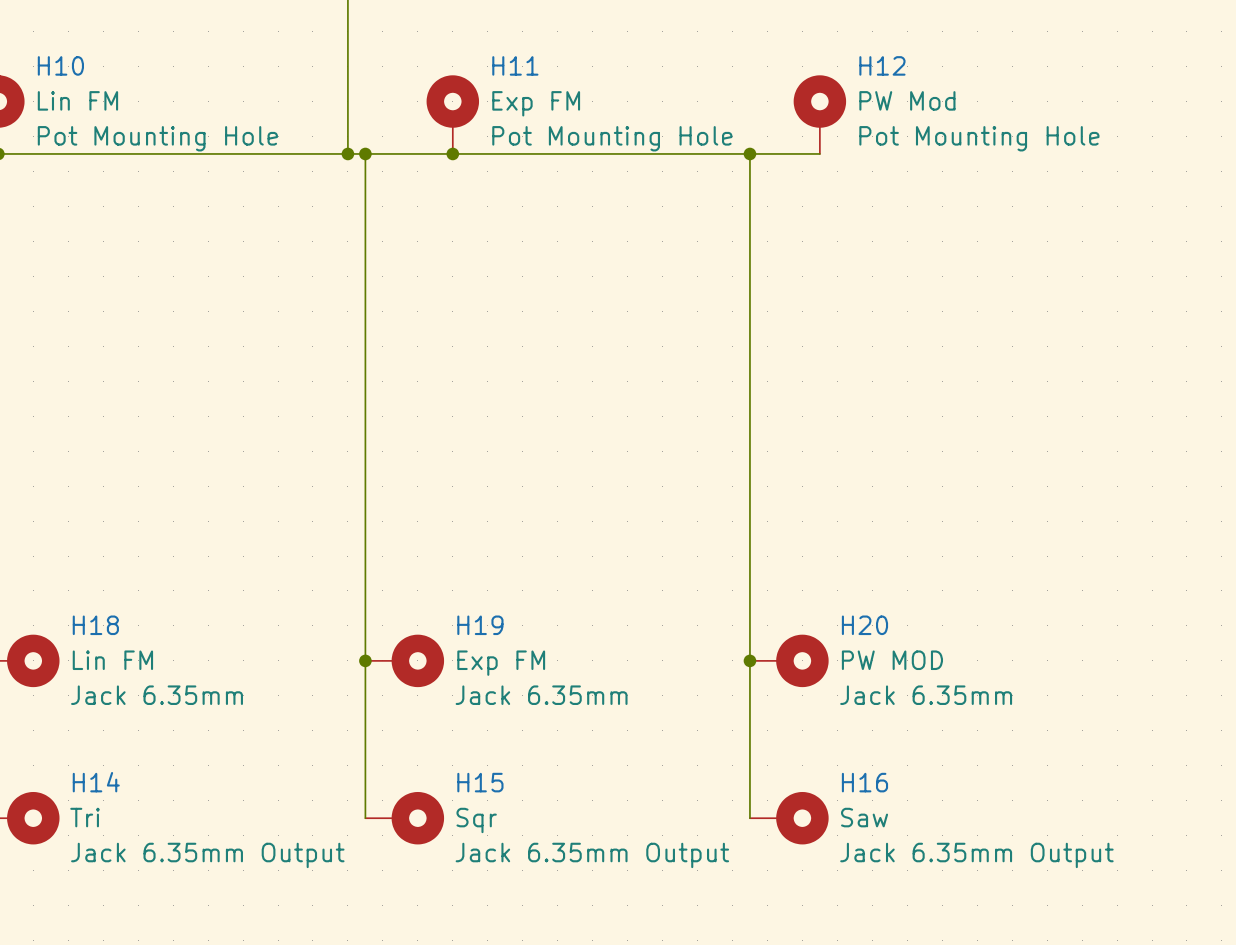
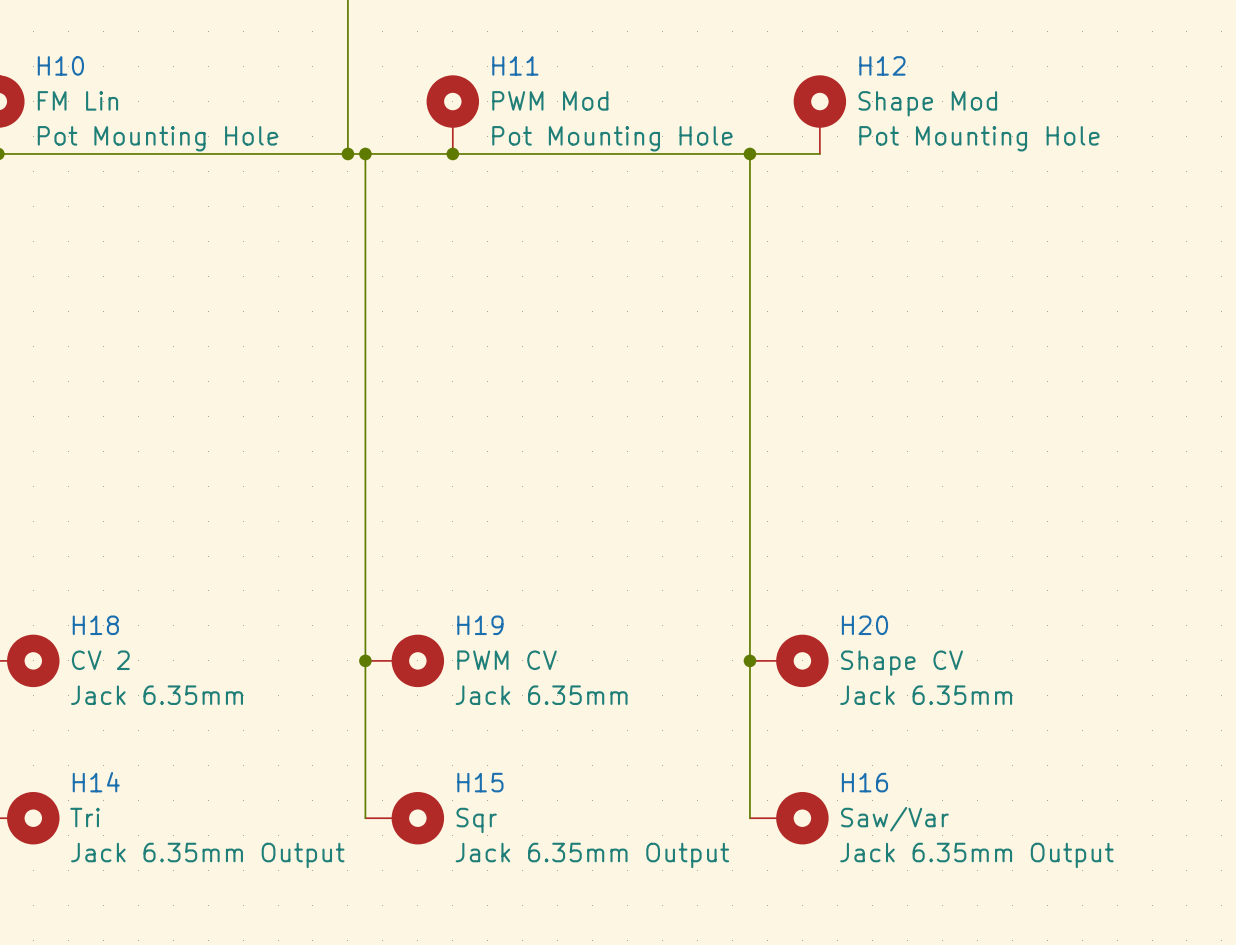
H10 value: Lin FM (77, 100) -> FM Lin (77, 100)
H12 value: PW Mod (907, 100) -> Shape Mod (927, 103)
H11 value: Exp FM (536, 103) -> PWM Mod (550, 100)
H18 value: Lin FM (112, 660) -> CV 2 (100, 660)
H20 value: PW MOD (892, 660) -> Shape CV (902, 663)
H19 value: Exp FM (501, 663) -> PWM CV (507, 660)
H16 value: Saw (864, 817) -> Saw/Var (894, 819)

